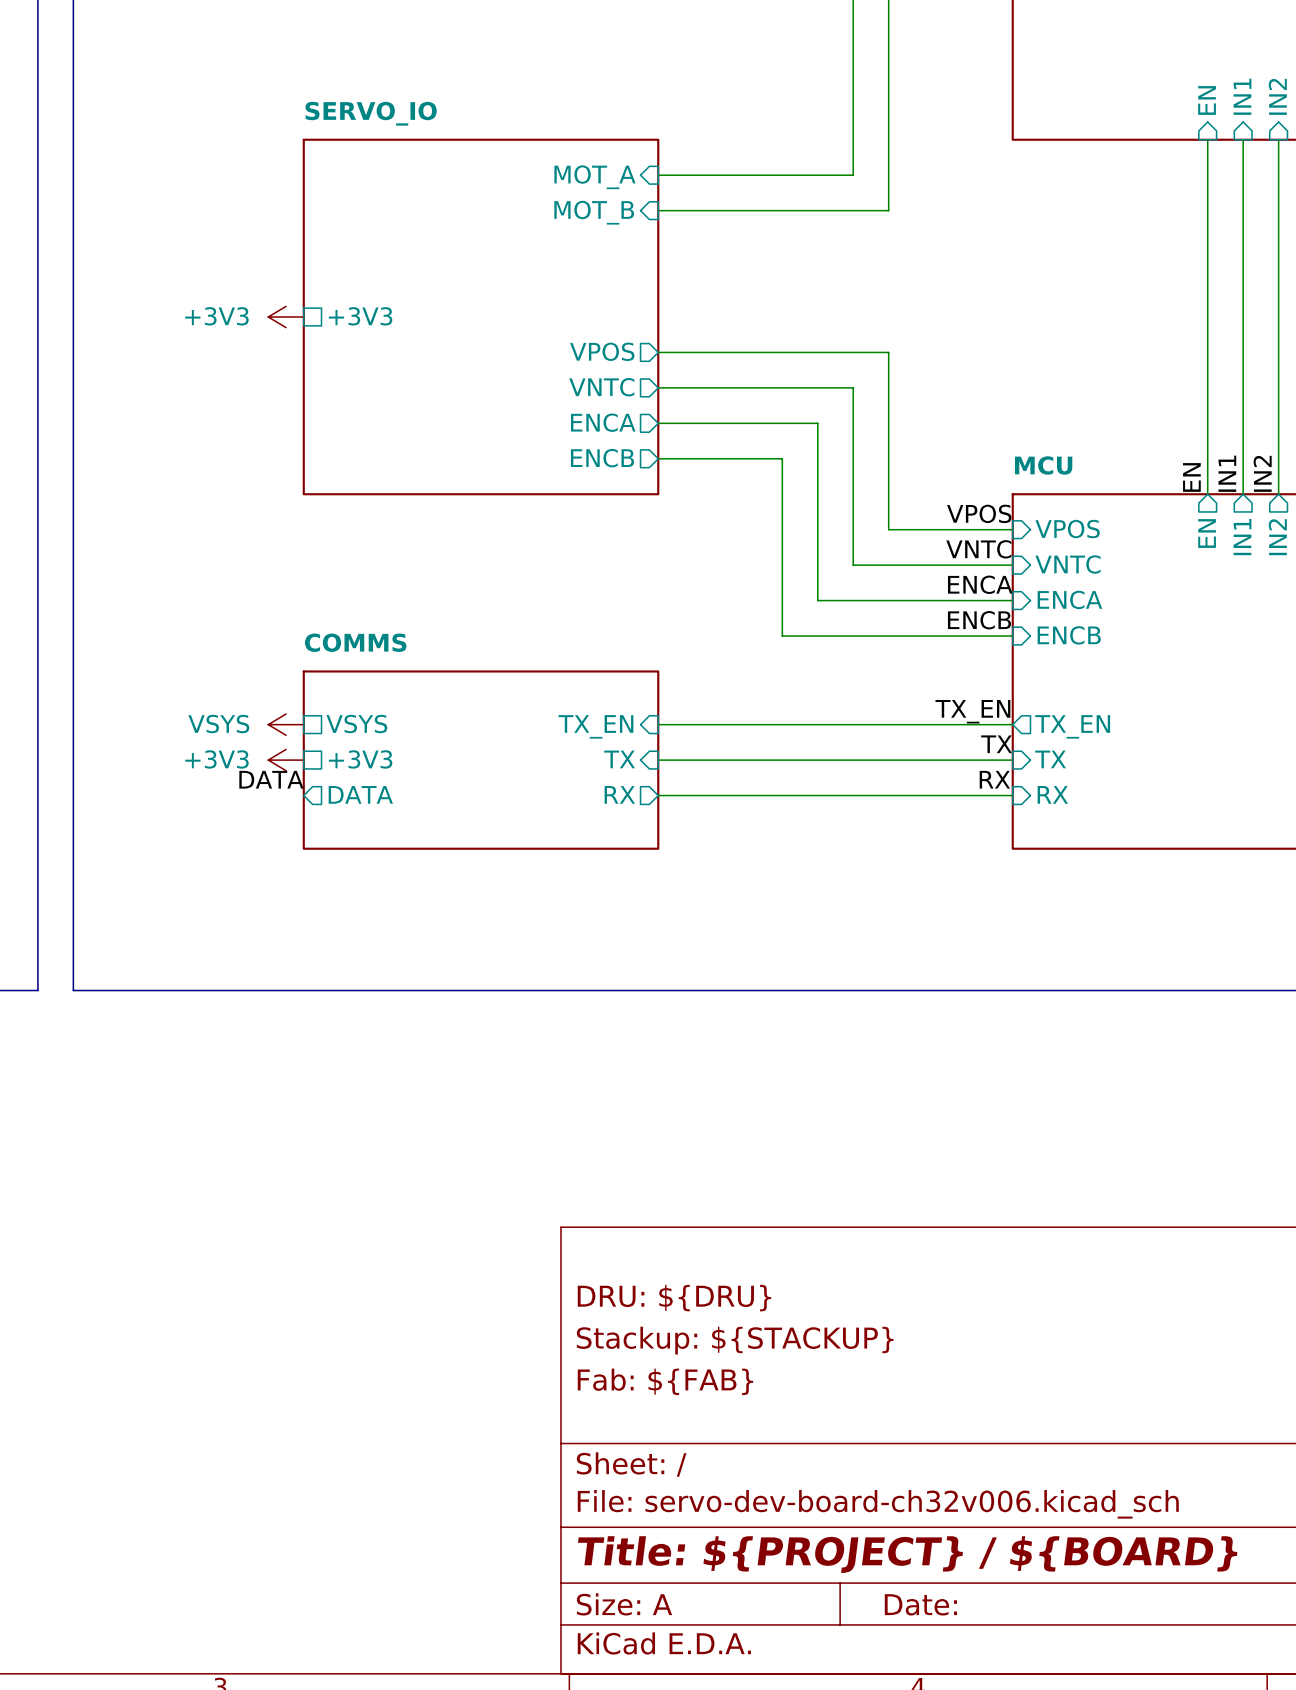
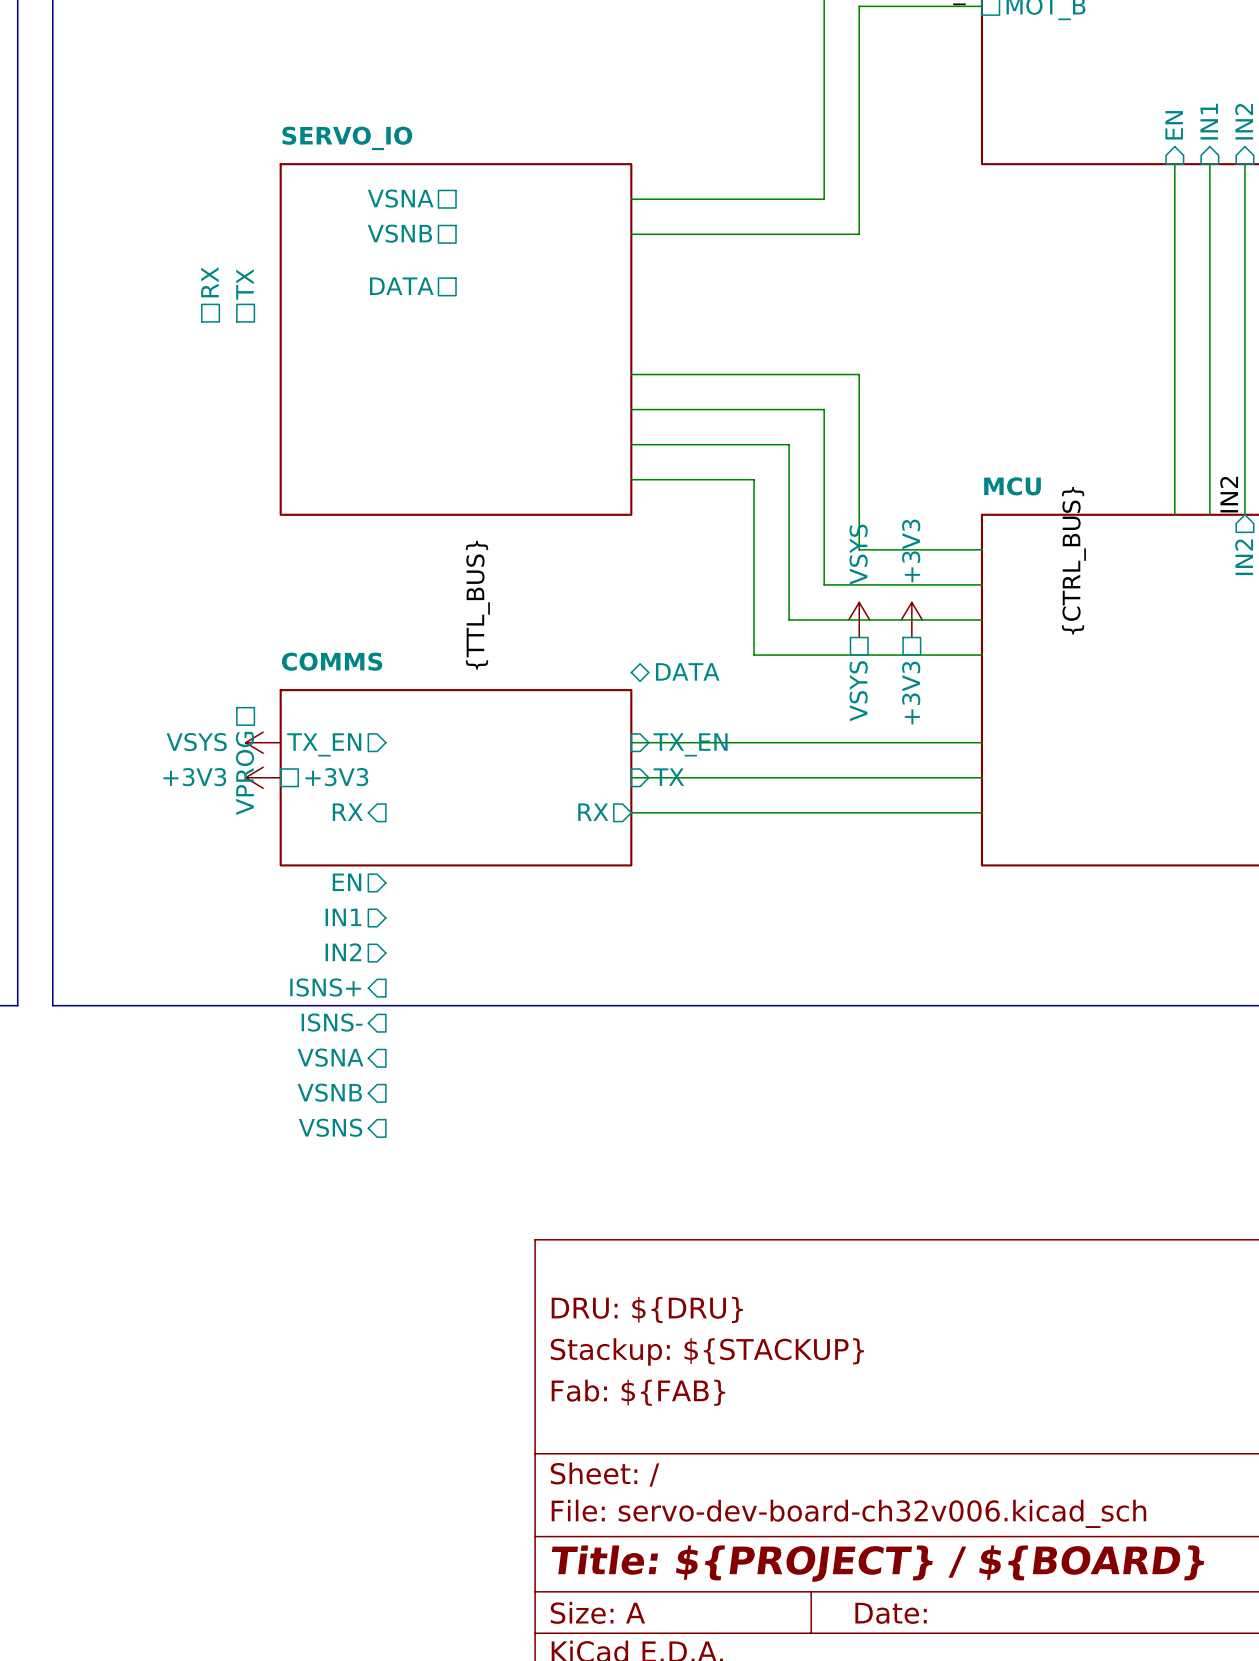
sheet pin: none -> VSNA (400, 198)
sheet pin: MOT_A (594, 177) -> none
sheet pin: none -> VSNB (399, 233)
sheet pin: MOT_B (594, 212) -> none
sheet pin: none -> RX (209, 282)
sheet pin: none -> TX (244, 284)
sheet pin: none -> DATA (401, 286)
sheet pin: +3V3 (360, 316) -> none
power symbol: +3V3 (286, 317) -> none
sheet pin: VPOS (602, 351) -> none
sheet pin: VNTC (601, 387) -> none
sheet pin: ENCA (603, 422) -> none
sheet pin: ENCB (602, 458) -> none
label: IN1 (1227, 473) -> none
label: EN (1191, 477) -> none
label: VPOS (979, 513) -> none
sheet pin: VPOS (1067, 529) -> none
sheet pin: EN (1207, 533) -> none
sheet pin: IN1 (1242, 537) -> none
label: none -> {CTRL_BUS} (1073, 560)
label: VNTC (978, 549) -> none
sheet pin: VNTC (1068, 564) -> none
label: ENCA (980, 584) -> none
label: none -> {TTL_BUS} (477, 605)
sheet pin: ENCA (1069, 599) -> none
power symbol: none -> VSYS (859, 619)
power symbol: none -> +3V3 (911, 619)
label: ENCB (979, 620) -> none
sheet pin: ENCB (1069, 635) -> none
sheet pin: none -> DATA (687, 671)
sheet pin: none -> VSYS (858, 691)
sheet pin: none -> +3V3 (911, 693)
label: TX_EN (972, 711) -> none
sheet pin: VSYS (356, 724) -> none
sheet pin: none -> TX_EN (324, 744)
sheet pin rotation: 0° (595, 726) -> 180° (690, 744)
sheet pin position: TX_EN (595, 726) -> TX_EN (690, 744)
sheet pin: TX_EN (1072, 726) -> none
label: TX (996, 744) -> none
sheet pin: none -> VPROG (244, 773)
sheet pin rotation: 0° (619, 759) -> 180° (668, 777)
sheet pin position: TX (619, 759) -> TX (668, 777)
sheet pin: TX (1050, 759) -> none
label: DATA (271, 779) -> none
label: RX (994, 779) -> none
sheet pin: DATA (360, 794) -> none
sheet pin: none -> RX (347, 812)
sheet pin: RX (1052, 794) -> none
sheet pin: none -> EN (347, 882)
sheet pin: none -> IN1 (343, 917)
sheet pin: none -> IN2 (343, 952)
sheet pin: none -> ISNS+ (325, 987)
sheet pin: none -> ISNS- (332, 1022)
sheet pin: none -> VSNA (330, 1057)
sheet pin: none -> VSNB (329, 1092)
sheet pin: none -> VSNS (330, 1127)

